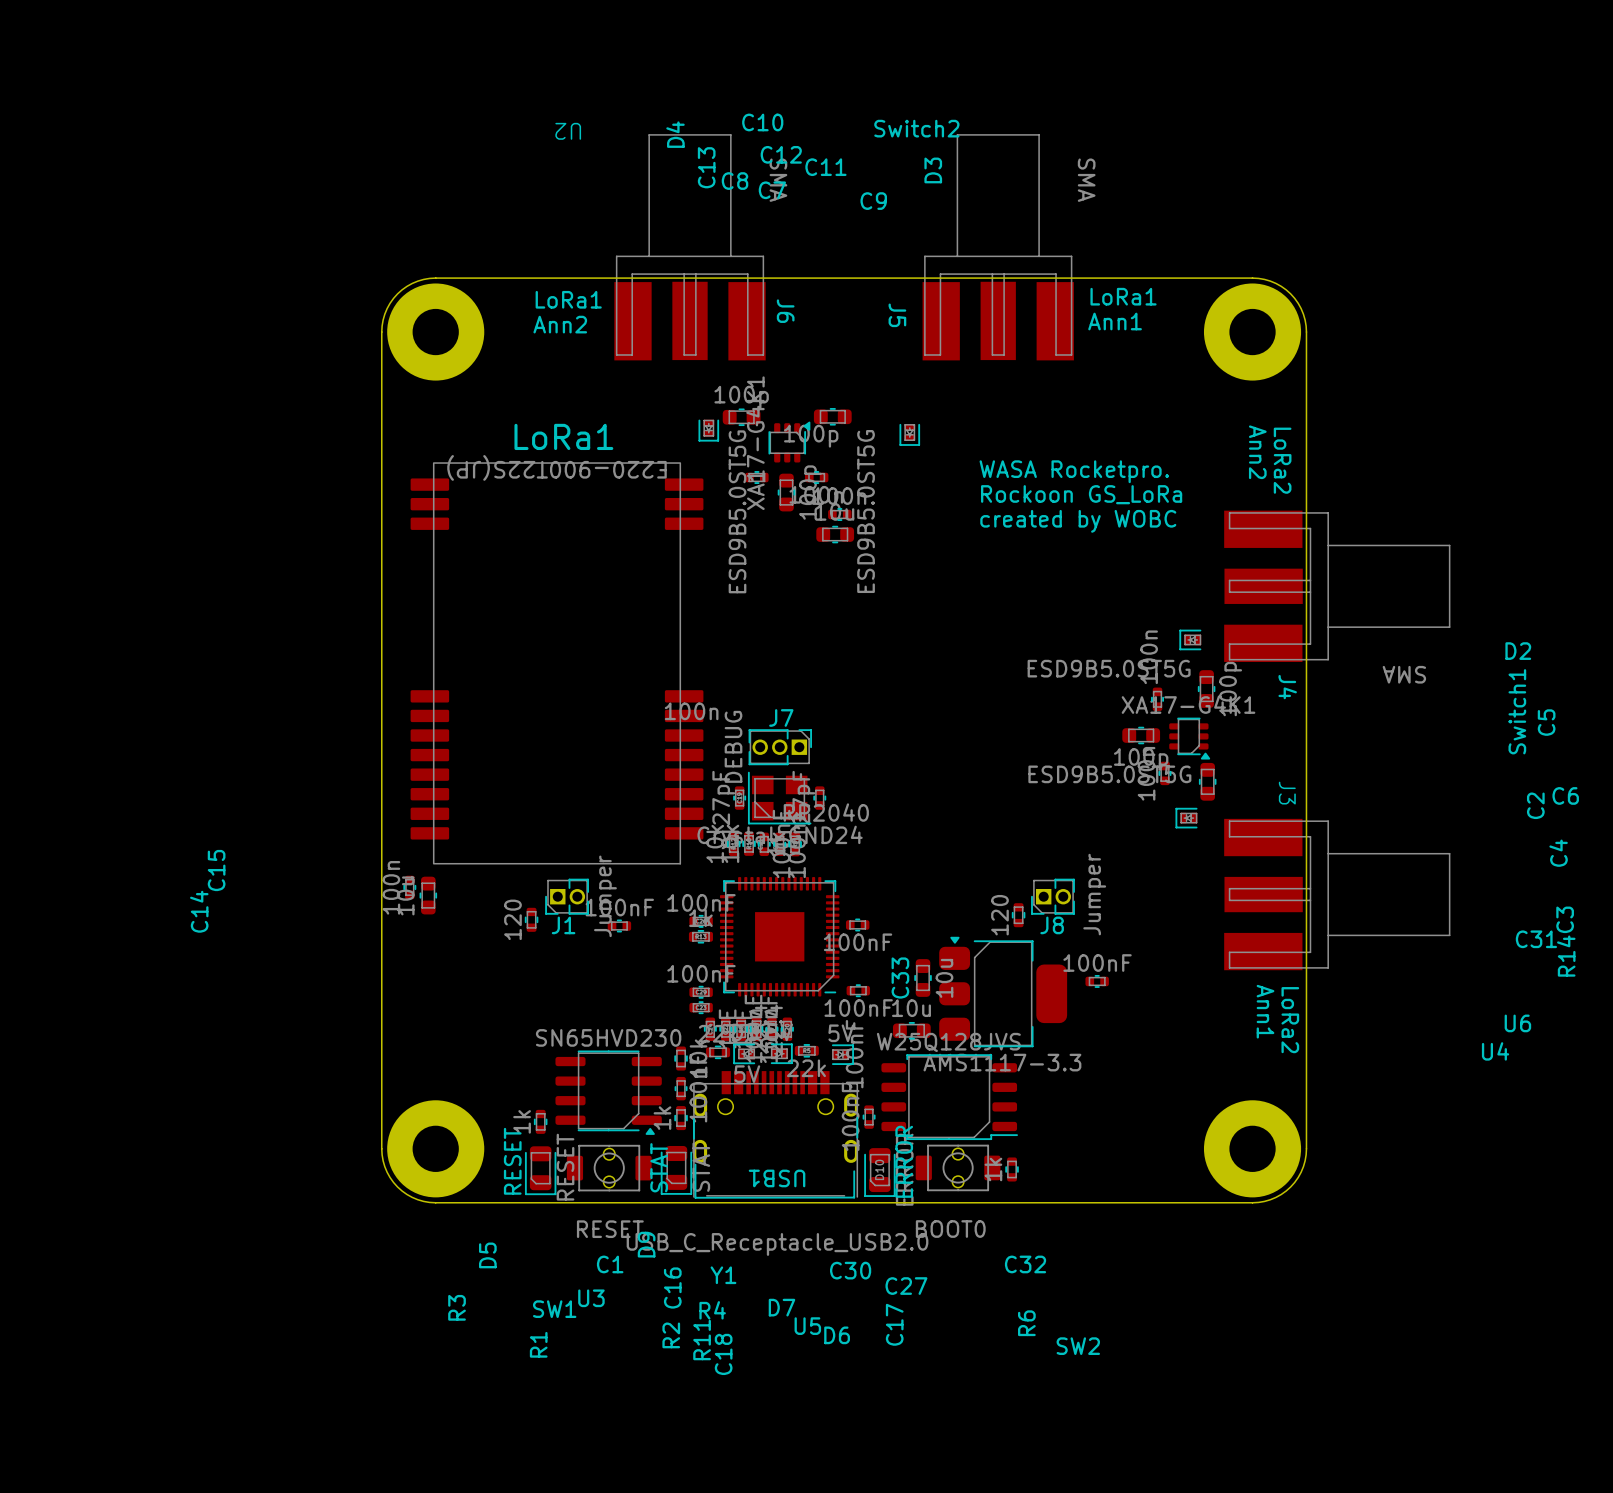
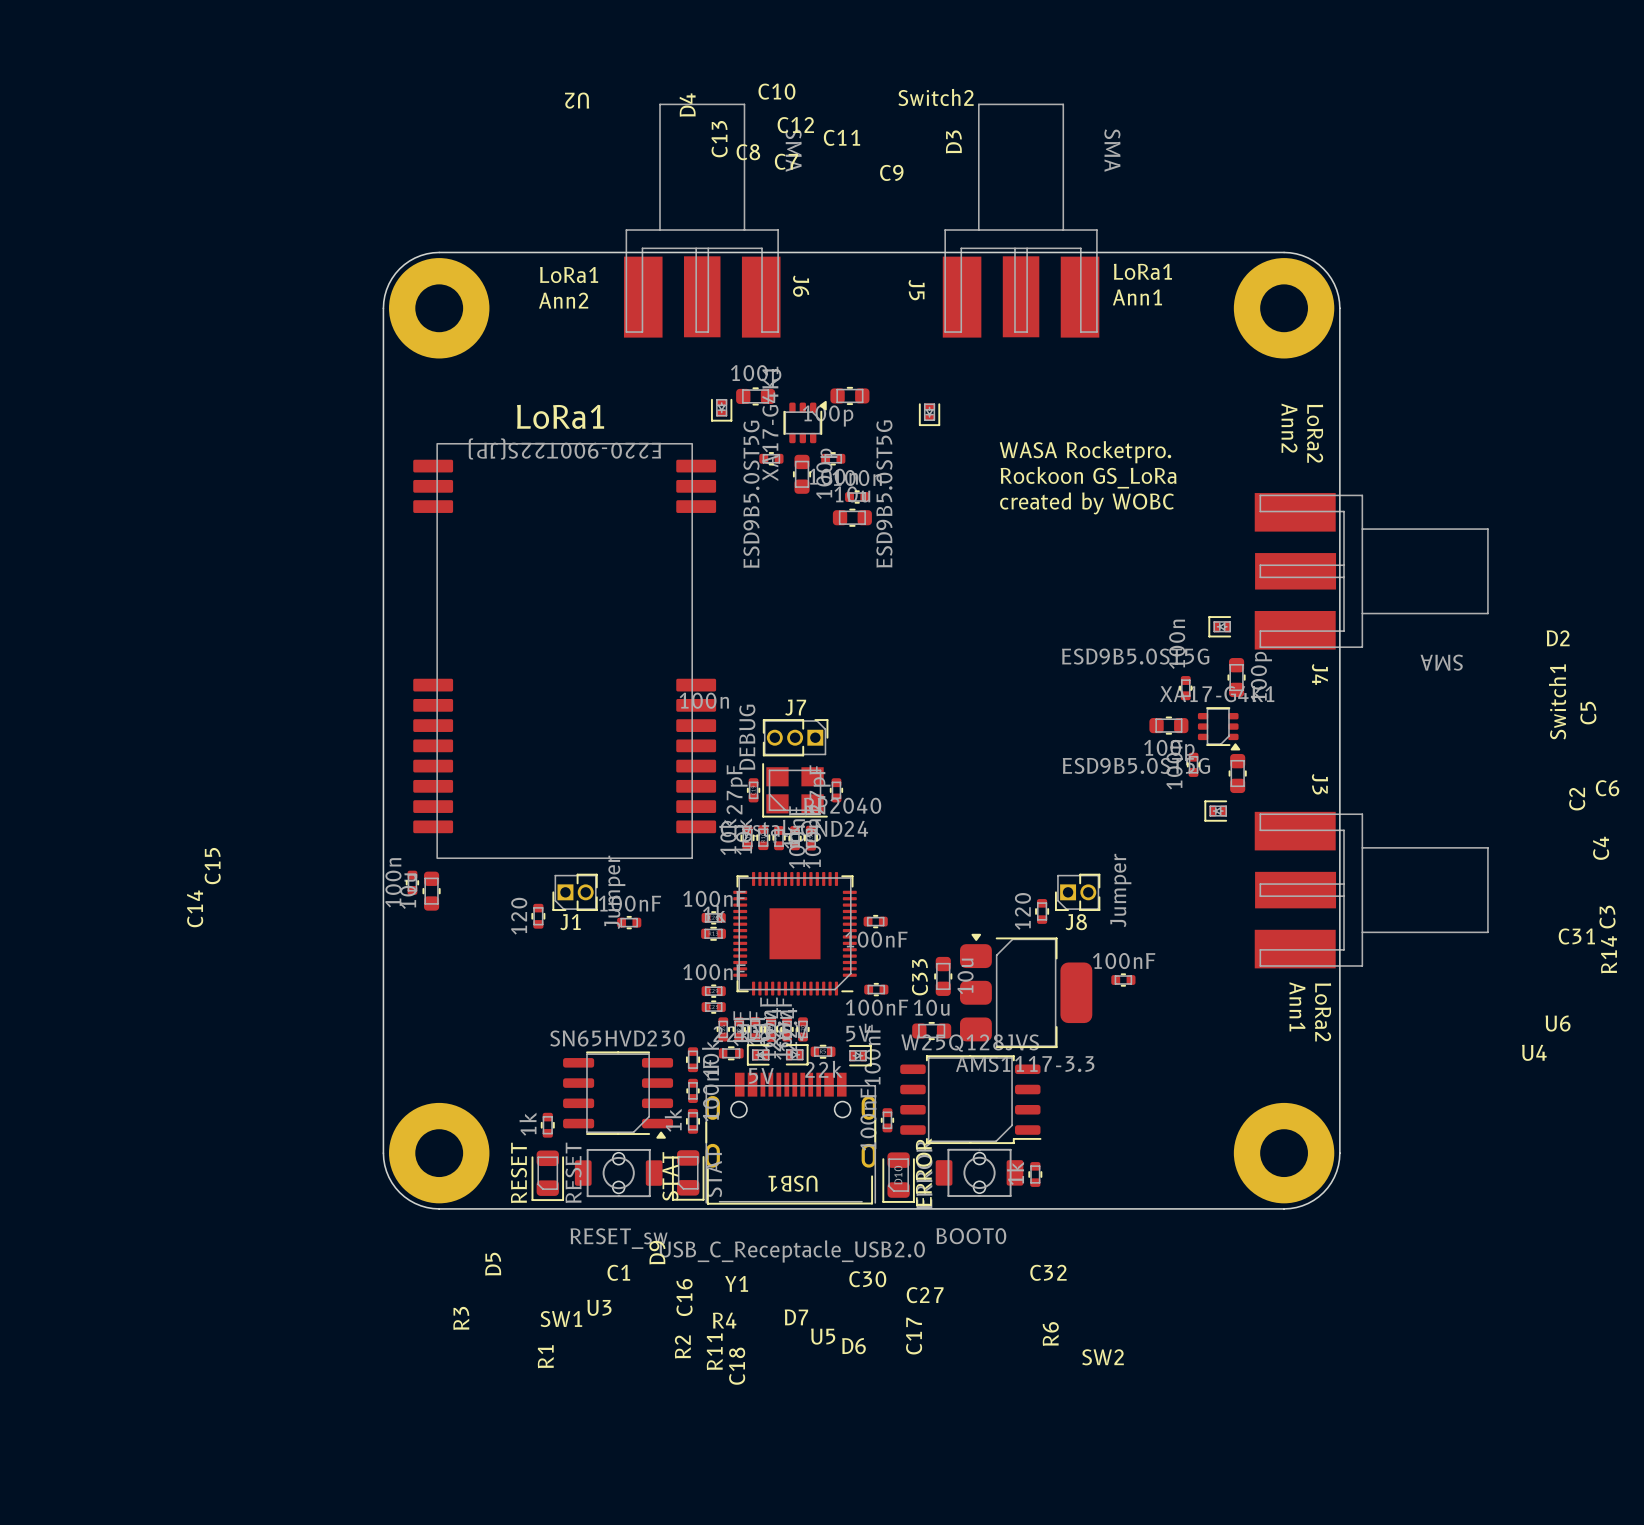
SW1 value: RESET (610, 1229) -> RESET_sw (619, 1238)

